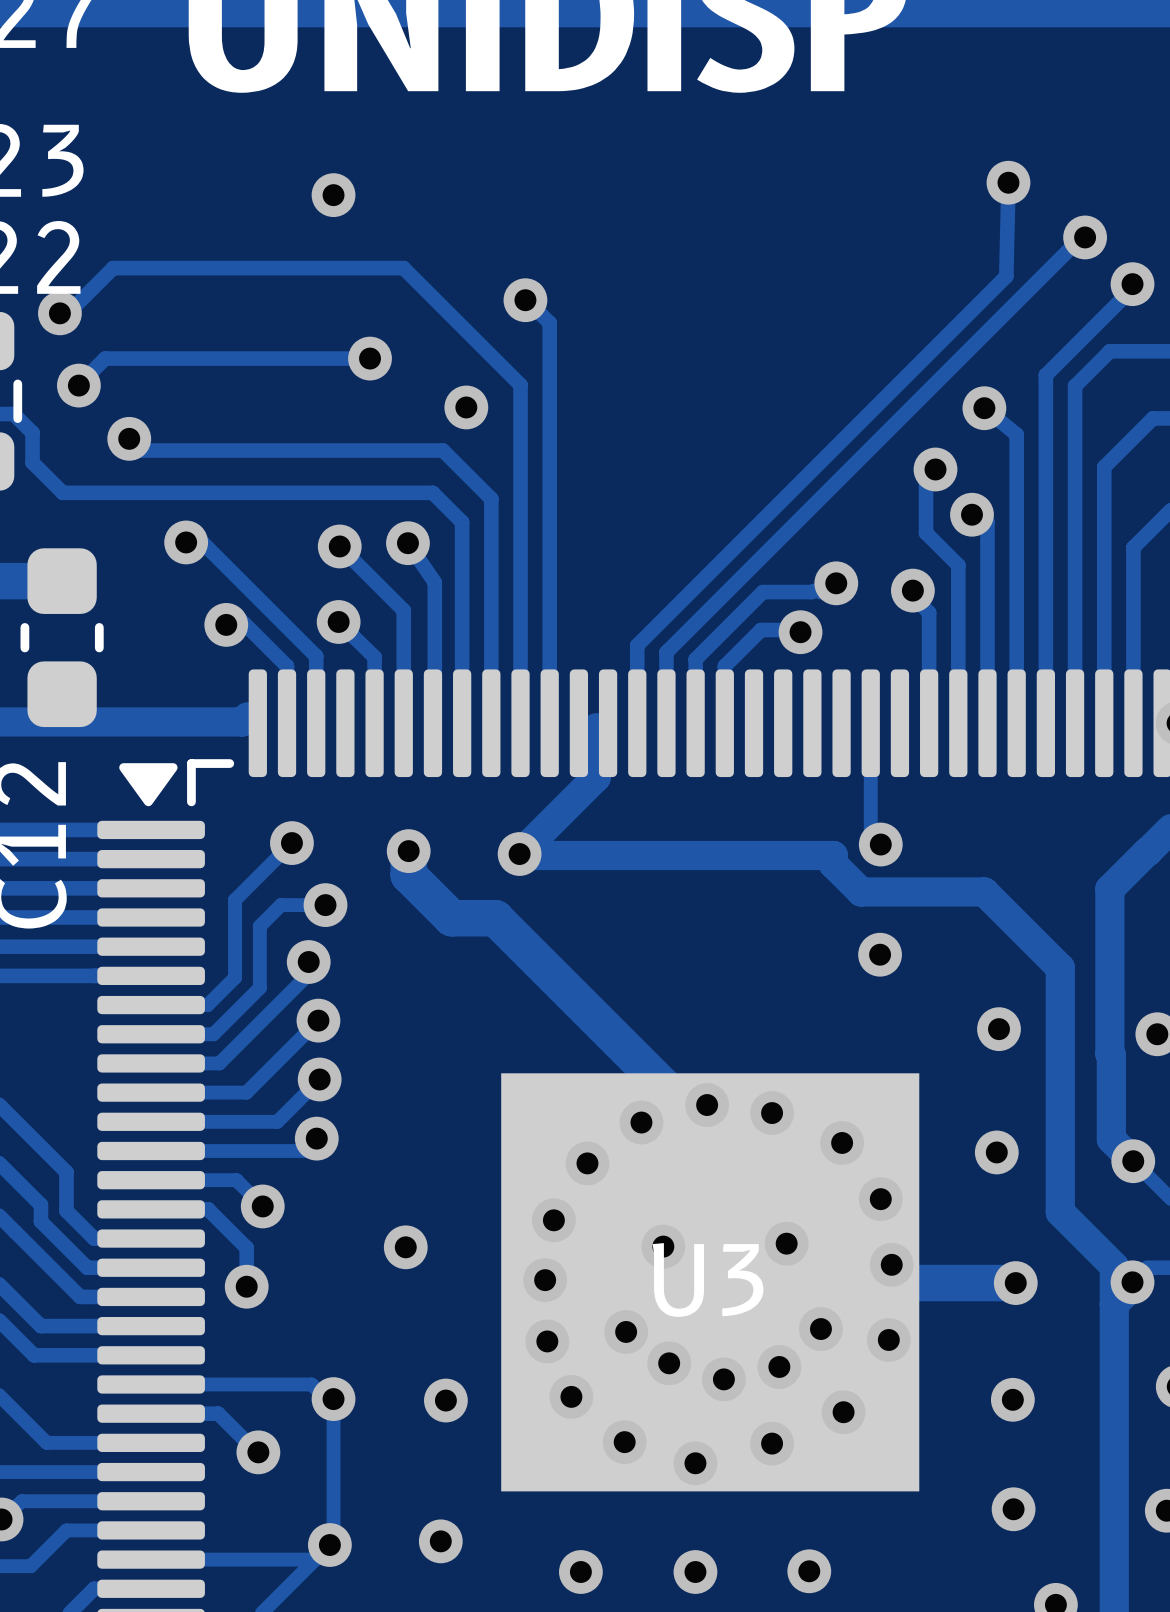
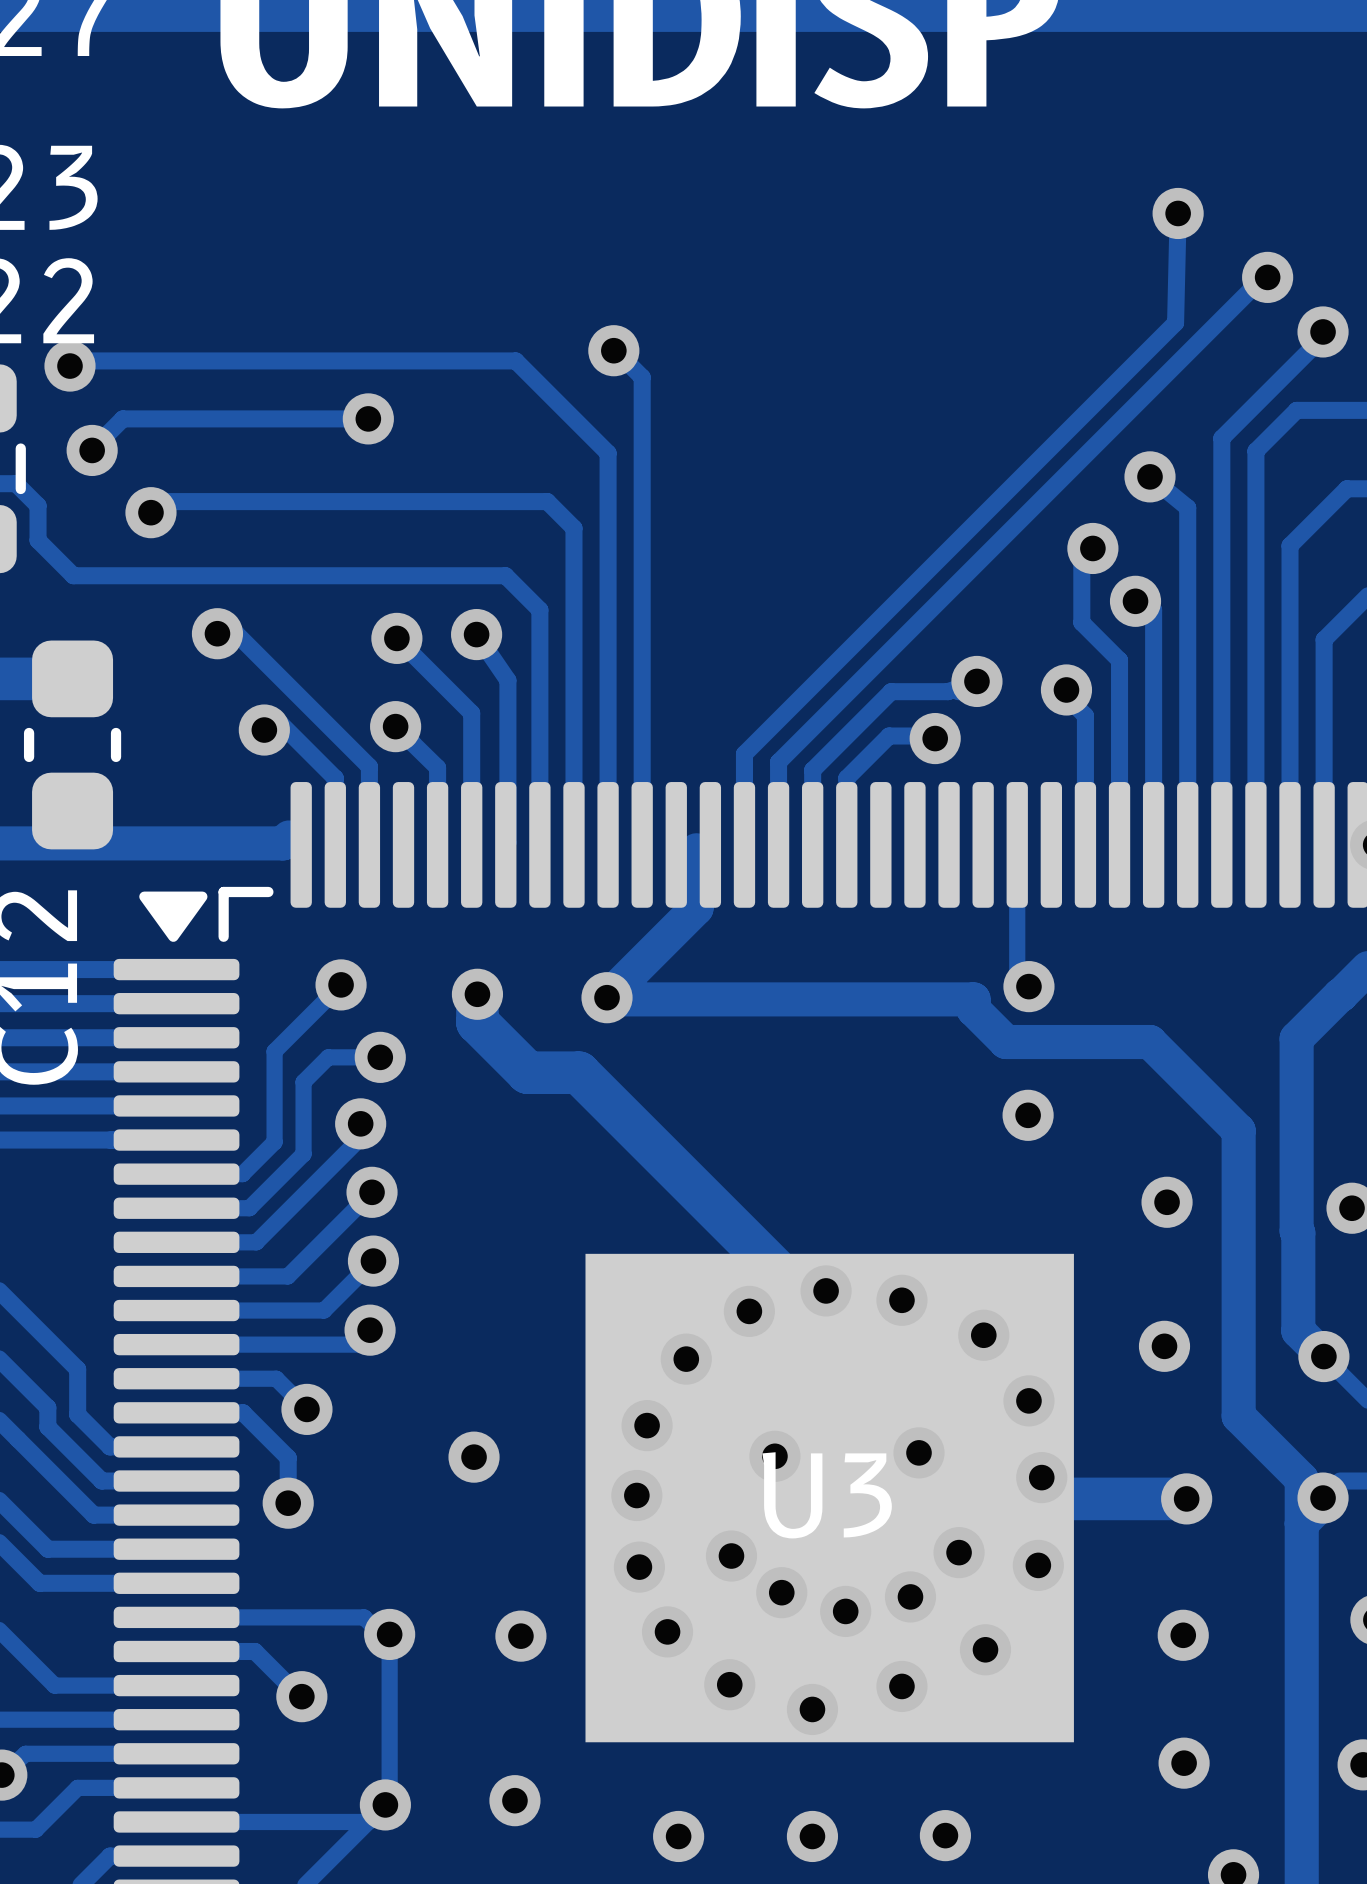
via: (333, 195) -> none
track: (72, 308) (113, 268) (403, 268) (520, 385) (520, 387) -> (84, 360) (515, 360) (608, 453)
track: (315, 358) (370, 358) -> none
via position: (370, 358) -> (368, 418)
via: (466, 407) -> none
track: (129, 438) (140, 450) (442, 450) (491, 498) -> (150, 512) (152, 501) (547, 501) (573, 528) (573, 582)

